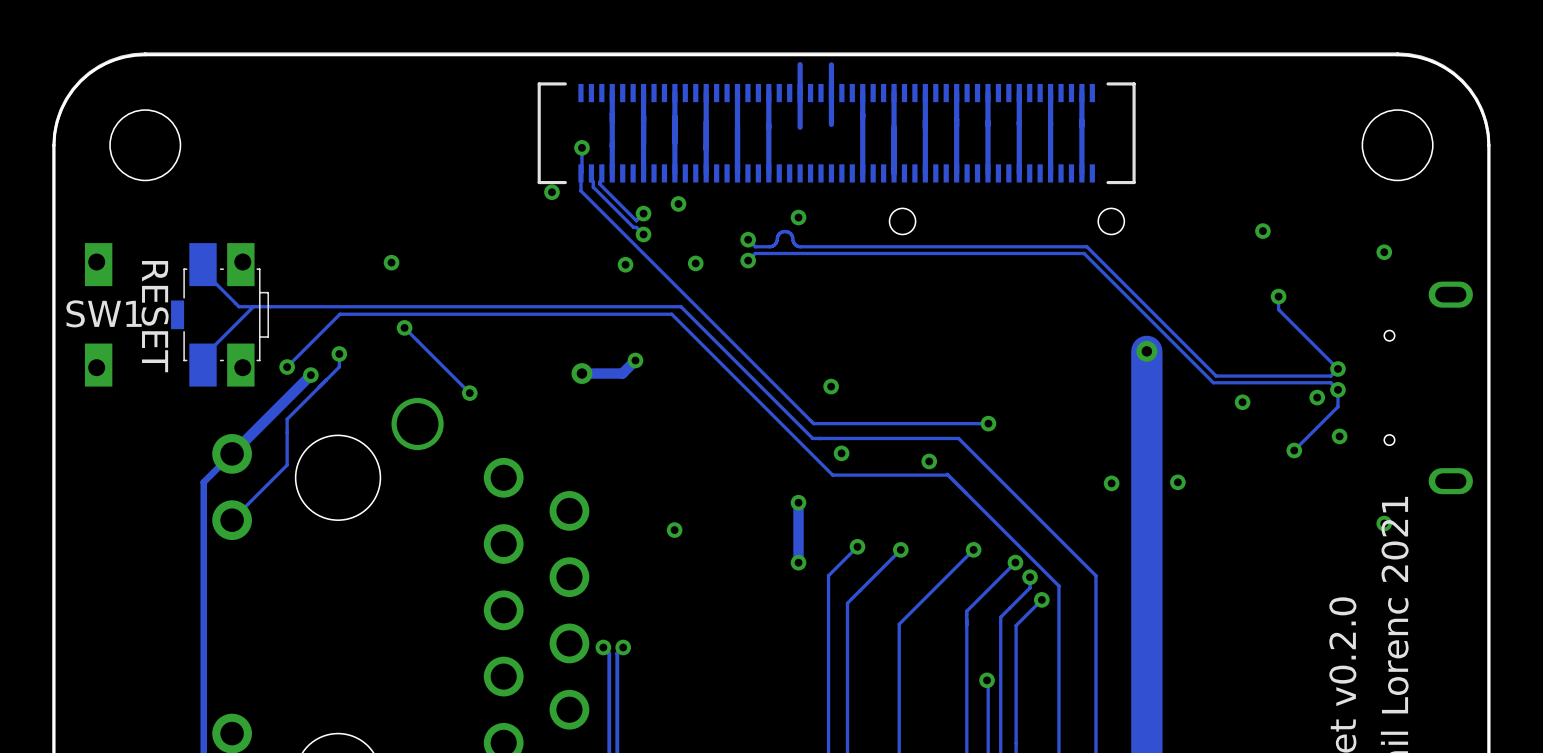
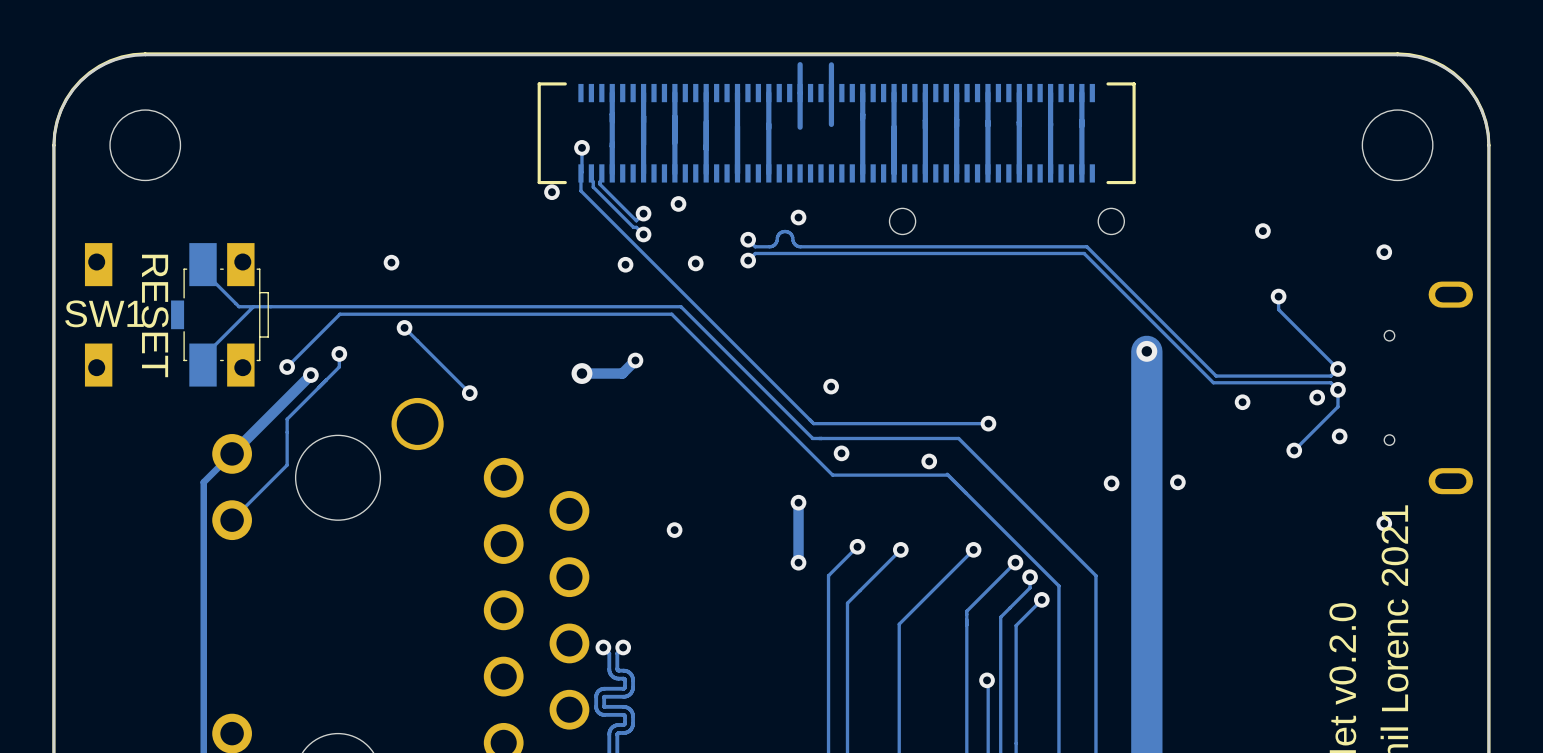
track: (617, 668) (617, 734) -> none
track: (609, 669) (609, 734) -> (609, 669) (612, 676) (623, 678)
track: none -> (619, 670) (627, 671) (632, 675) (632, 691) (625, 696) (604, 696)
track: none -> (625, 680) (625, 686)
track: none -> (623, 688) (602, 688) (597, 691) (596, 696) (596, 708) (599, 713) (623, 714)
track: none -> (604, 697) (604, 706)
track: none -> (604, 706) (625, 707) (632, 712) (632, 727) (627, 732) (619, 732)
track: none -> (625, 716) (625, 723)
track: none -> (623, 724) (612, 727) (609, 734)

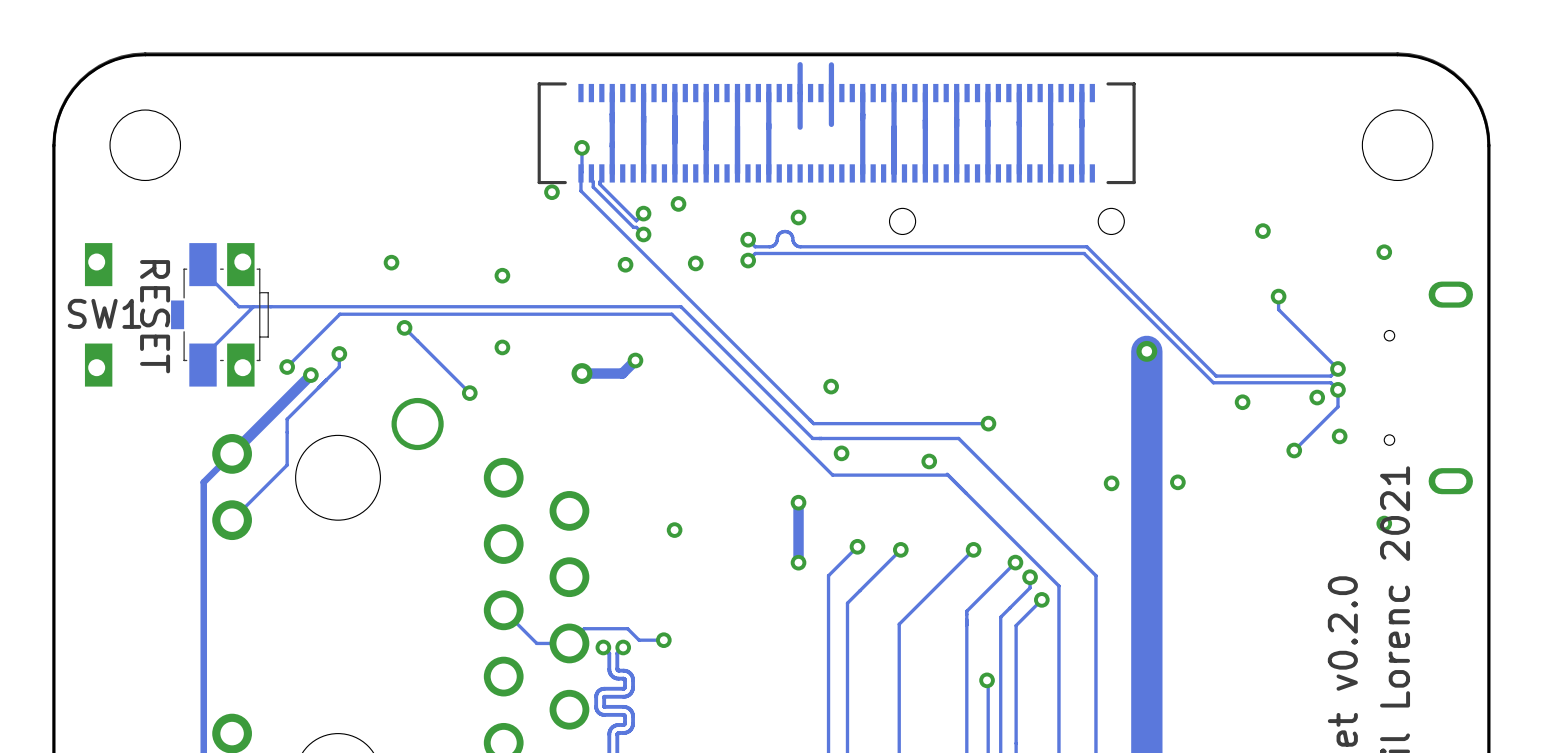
via: none -> (502, 275)
via: none -> (502, 347)
track: none -> (503, 610) (536, 643) (569, 643) (584, 628) (627, 628) (639, 640) (663, 640)
via: none -> (663, 640)

